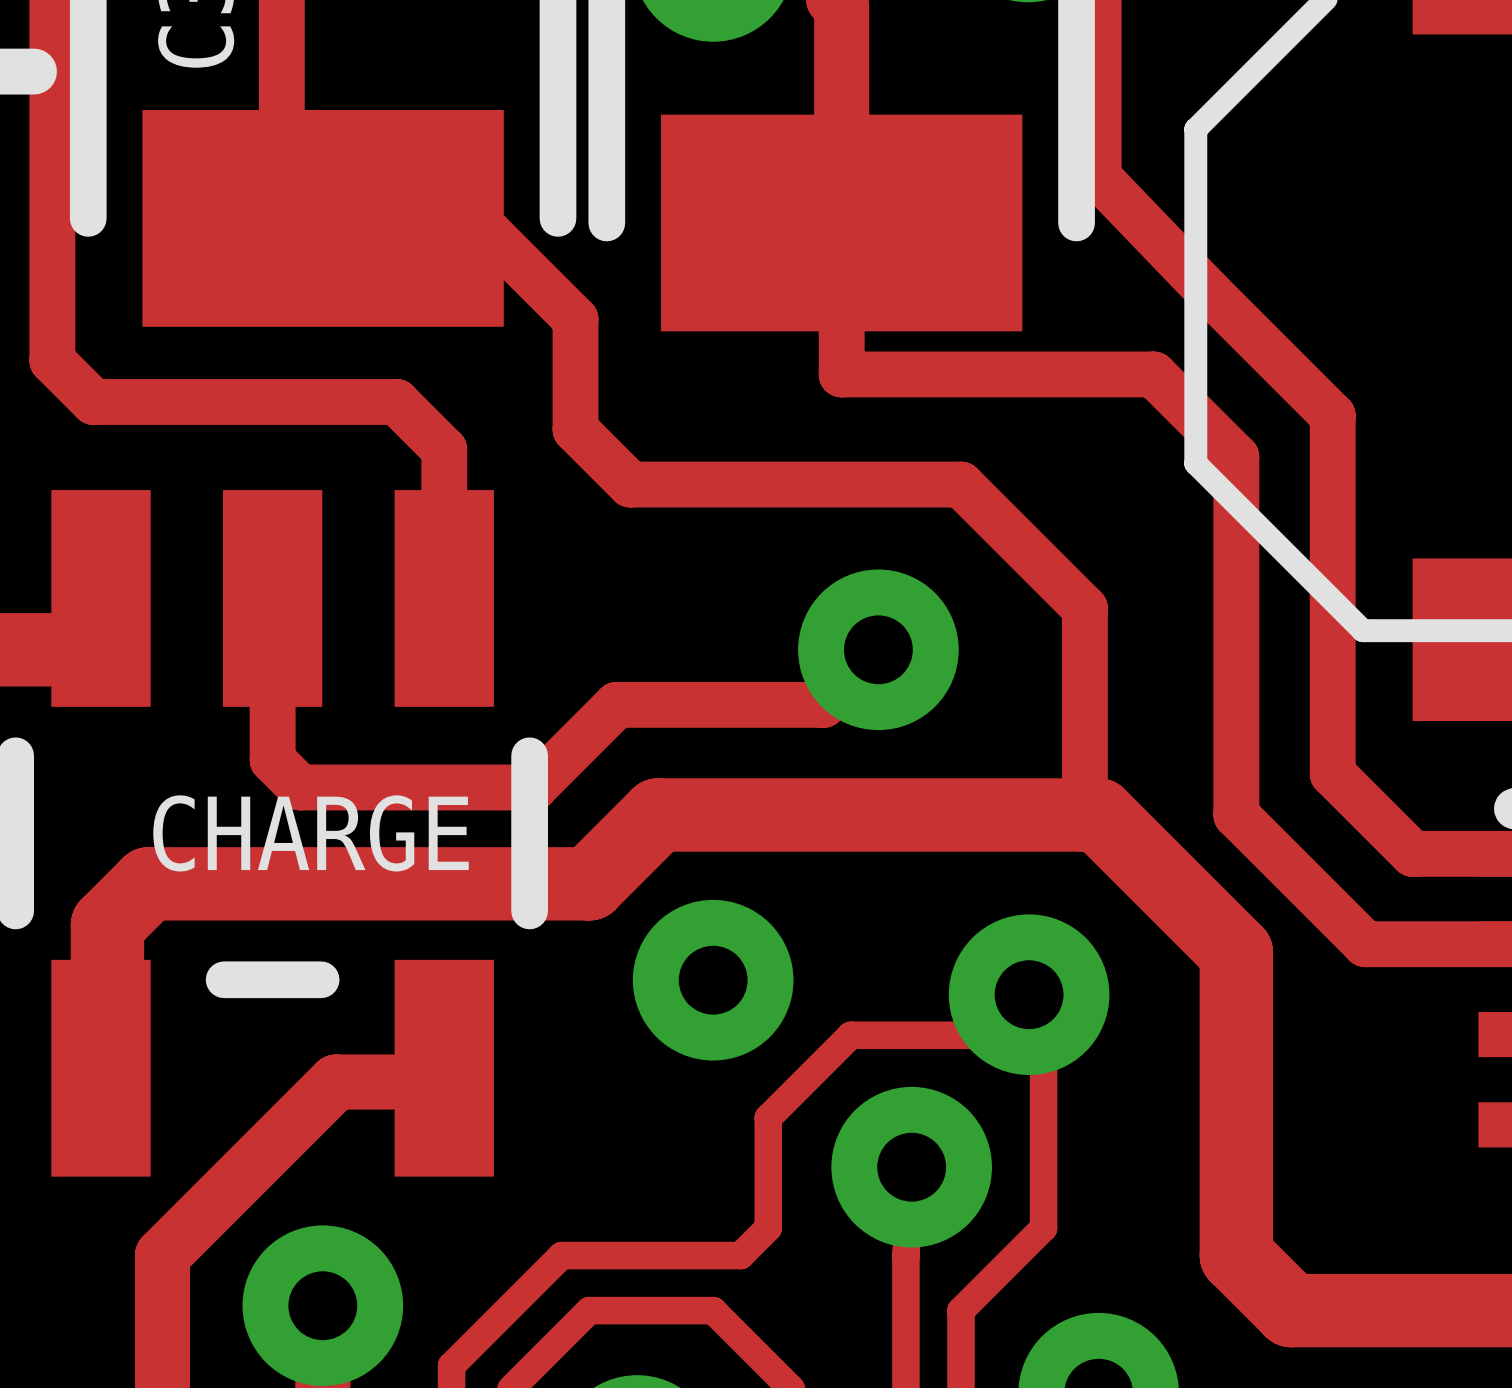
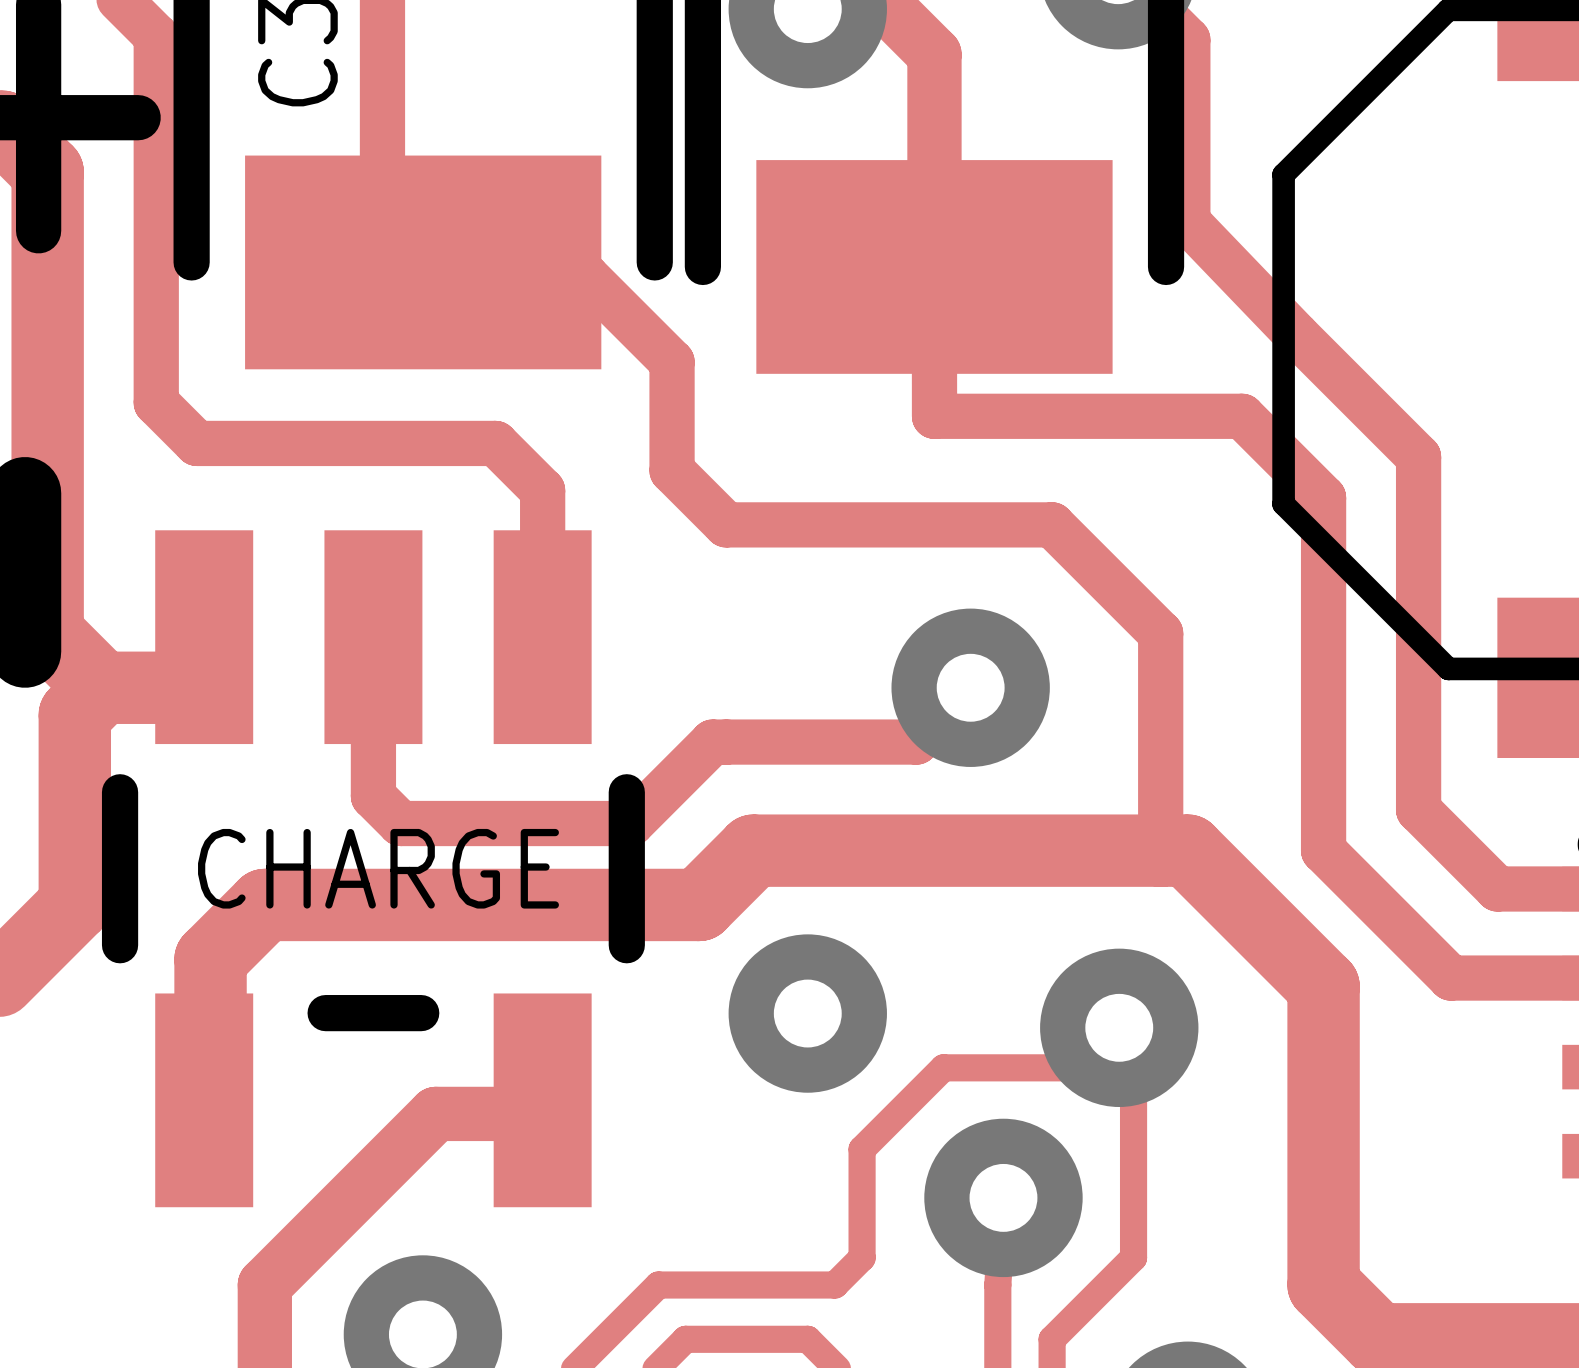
track: (1071, 594) (1084, 608) (1084, 815) -> (1160, 633) (1160, 850)
track: (603, 870) (589, 883) (148, 883) -> (699, 904) (264, 904) (251, 918)

